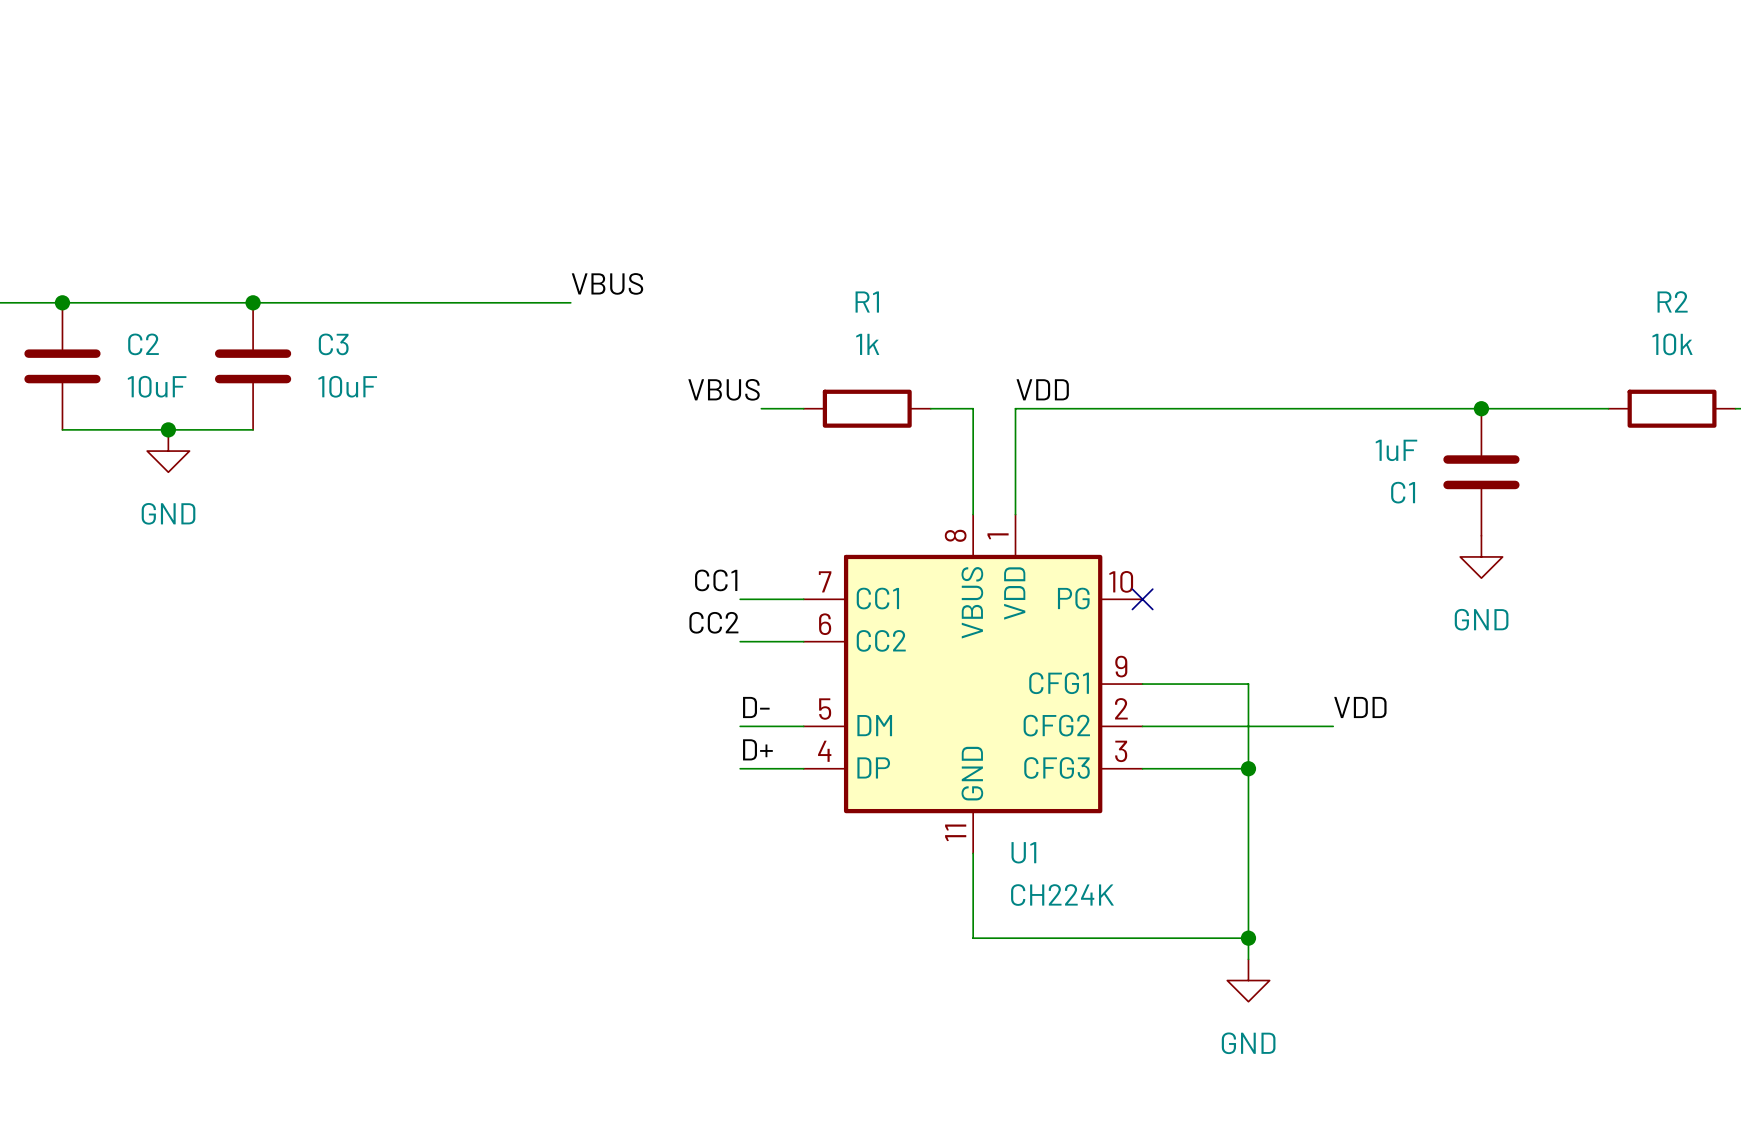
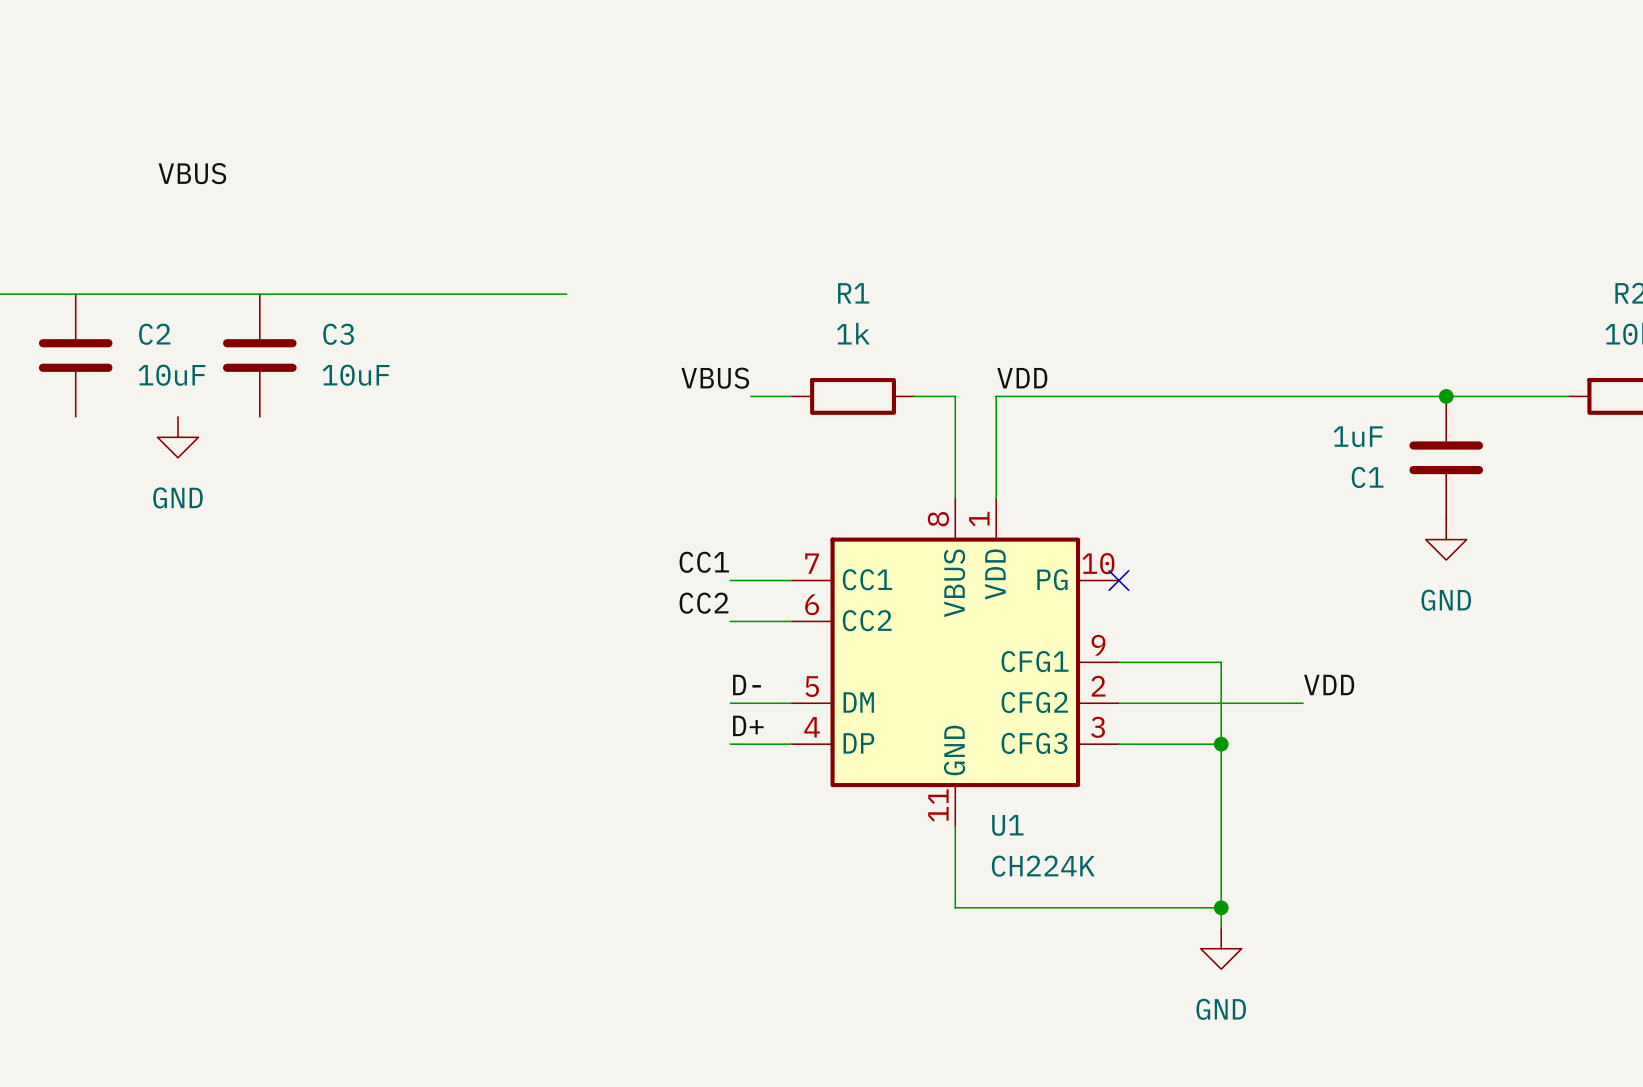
label: none -> VBUS (192, 173)
label: VBUS (607, 283) -> none
junction: (62, 302) -> none
junction: (253, 302) -> none
wire: (62, 429) (253, 429) -> none
junction: (168, 429) -> none

